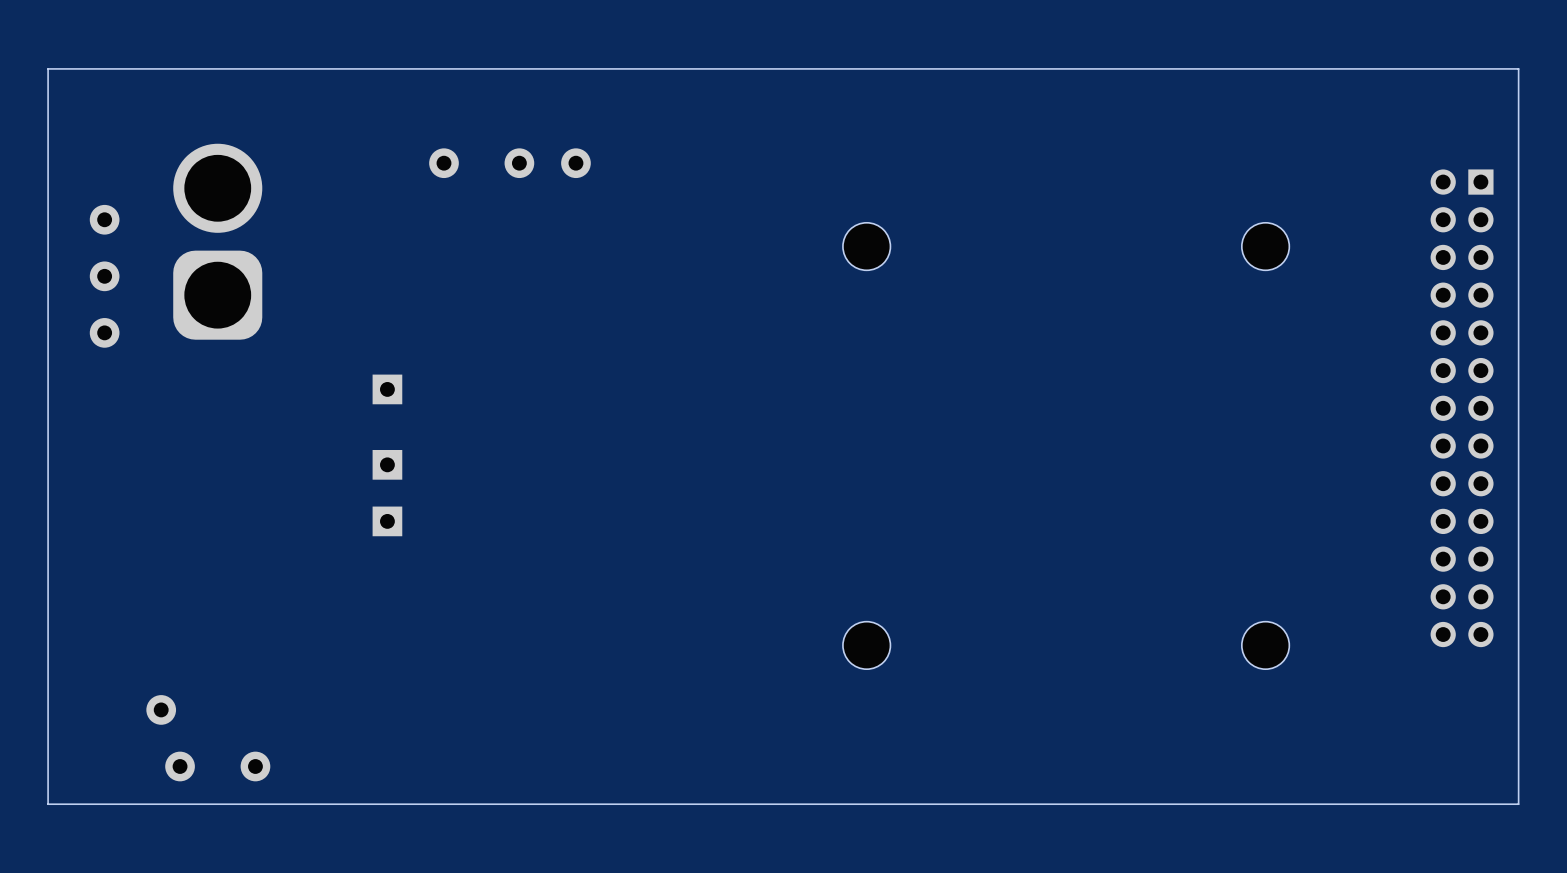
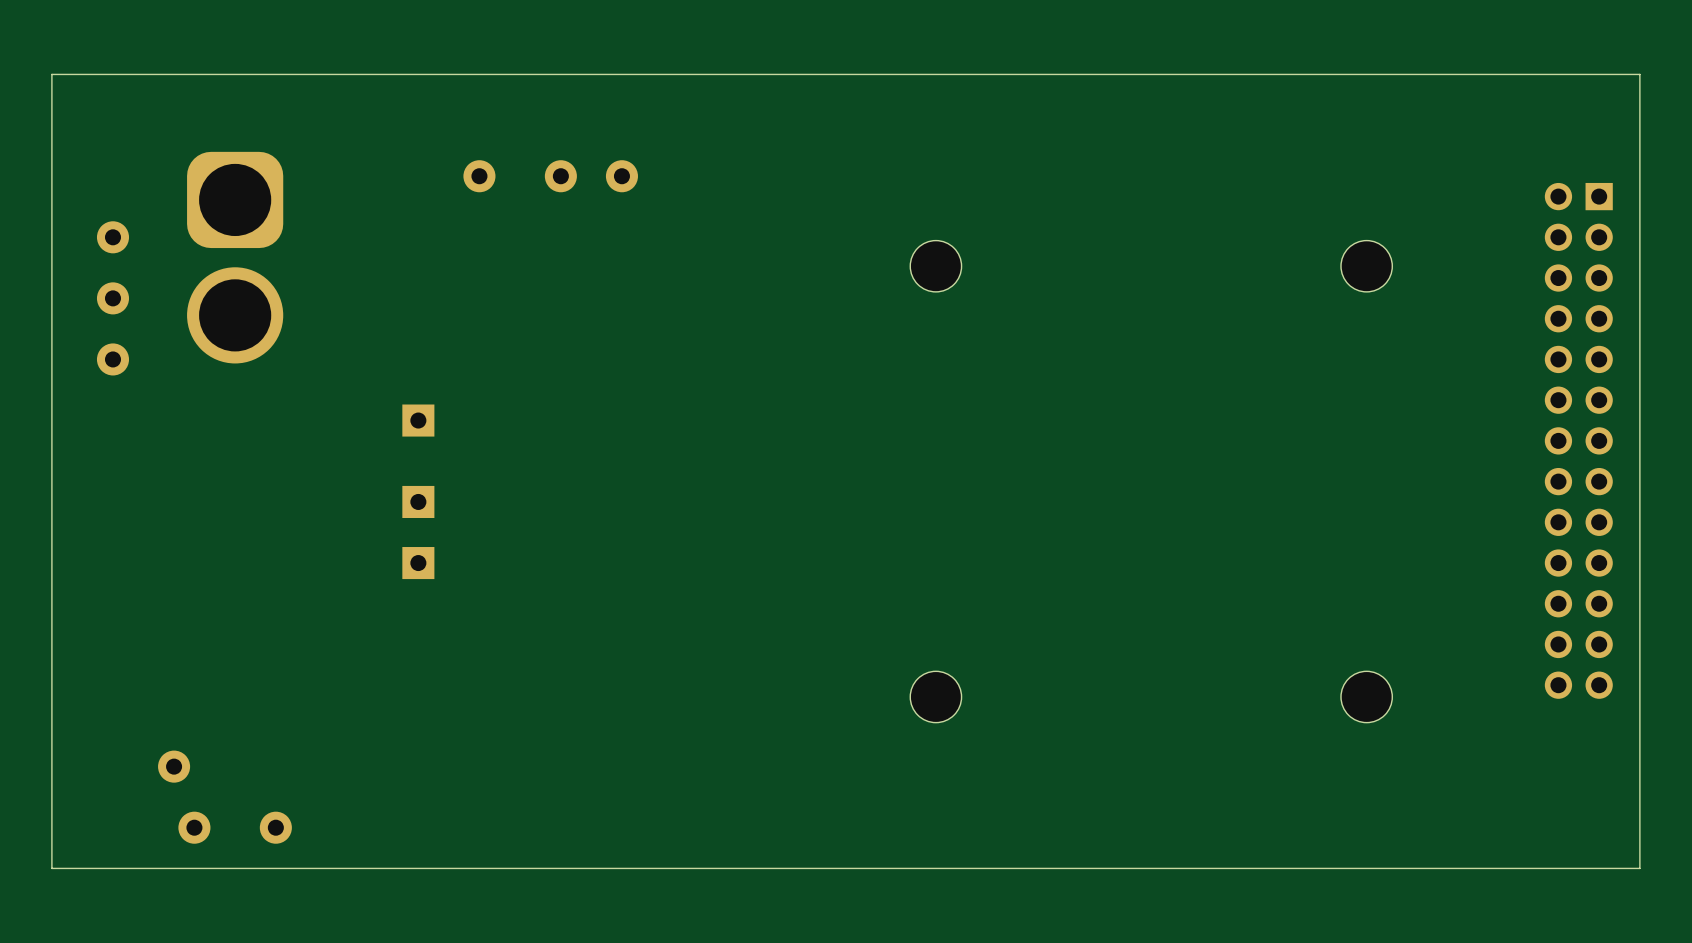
part rotation: 0° (217, 241) -> 180° (235, 257)

